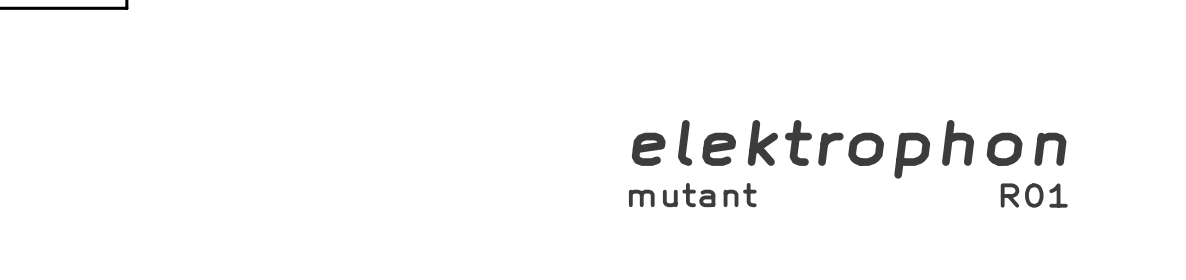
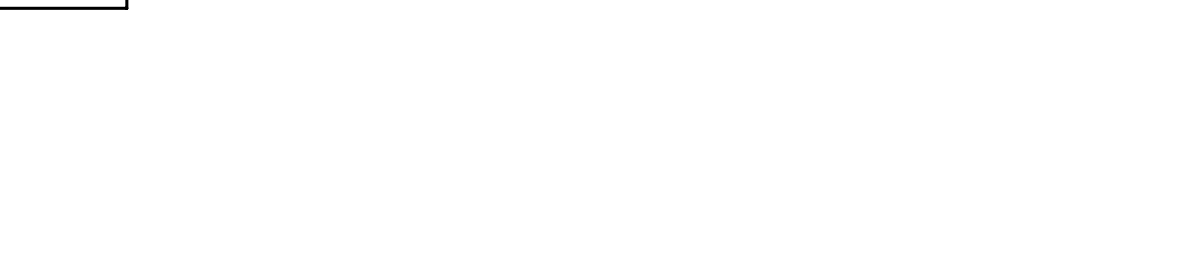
drawing: [628, 119, 1068, 208] -> none

